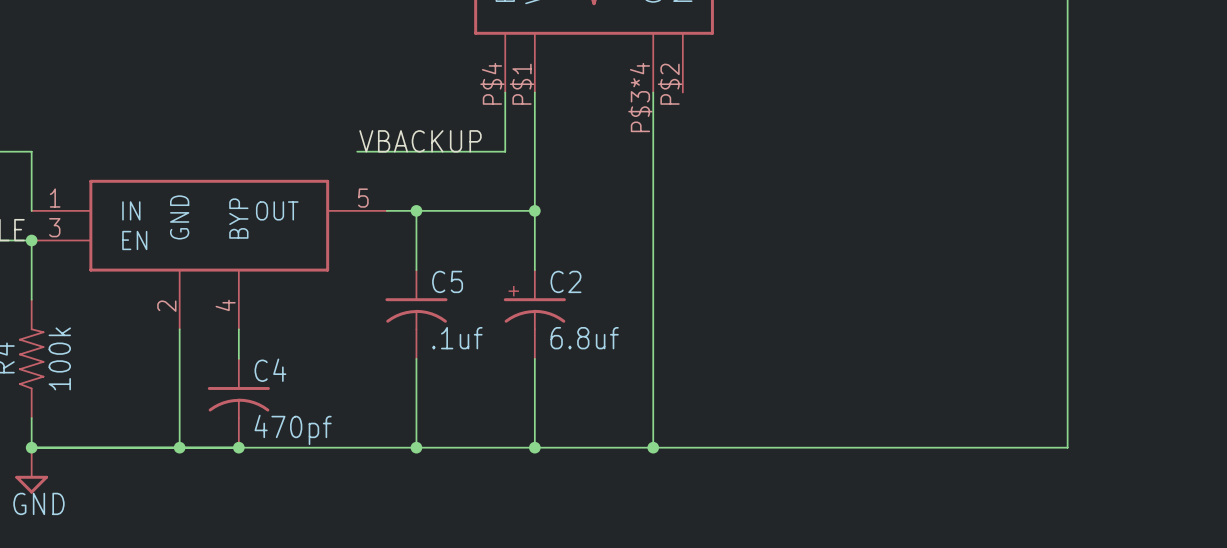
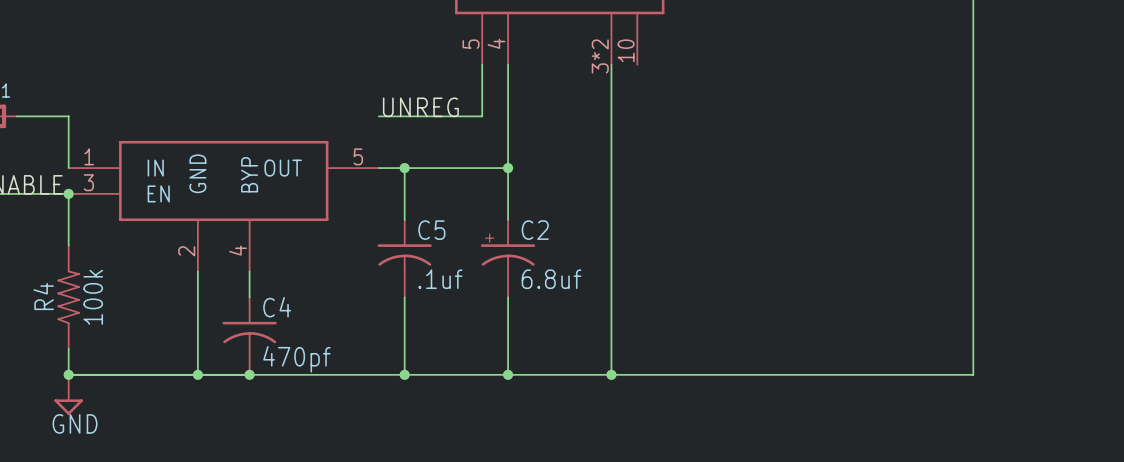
part pin number: P$4 (492, 83) -> 5 (471, 44)
part pin number: P$1 (522, 84) -> 4 (496, 43)
part pin number: P$2 (670, 84) -> 10 (626, 50)
part pin number: P$3*4 (640, 97) -> 3*2 (600, 56)
label: VBACKUP (420, 141) -> none
label: none -> UNREG (420, 107)
wire: (357, 151) (386, 151) -> none

